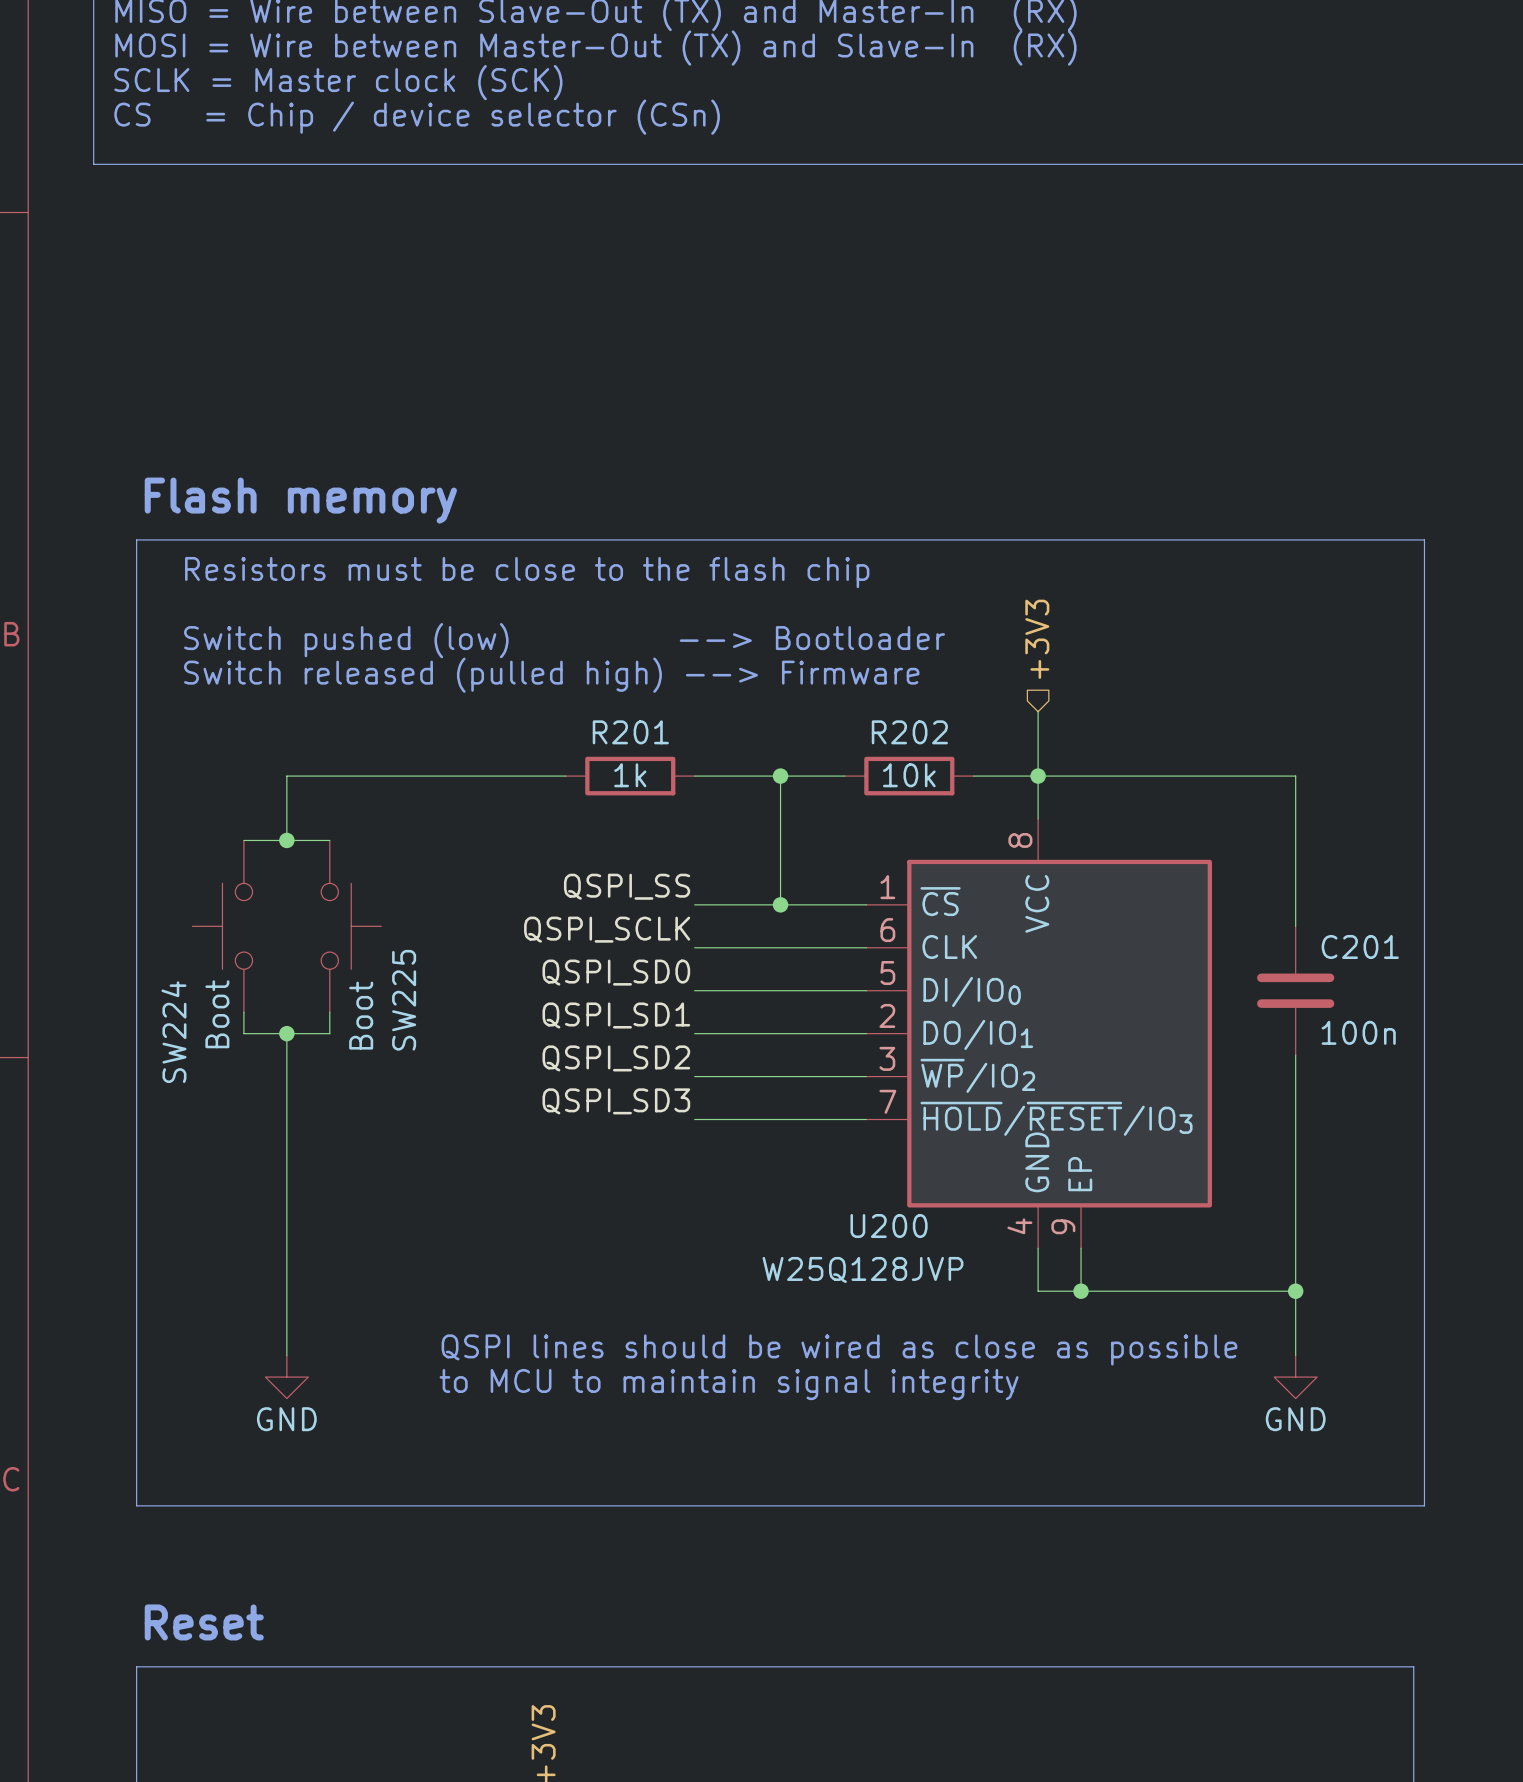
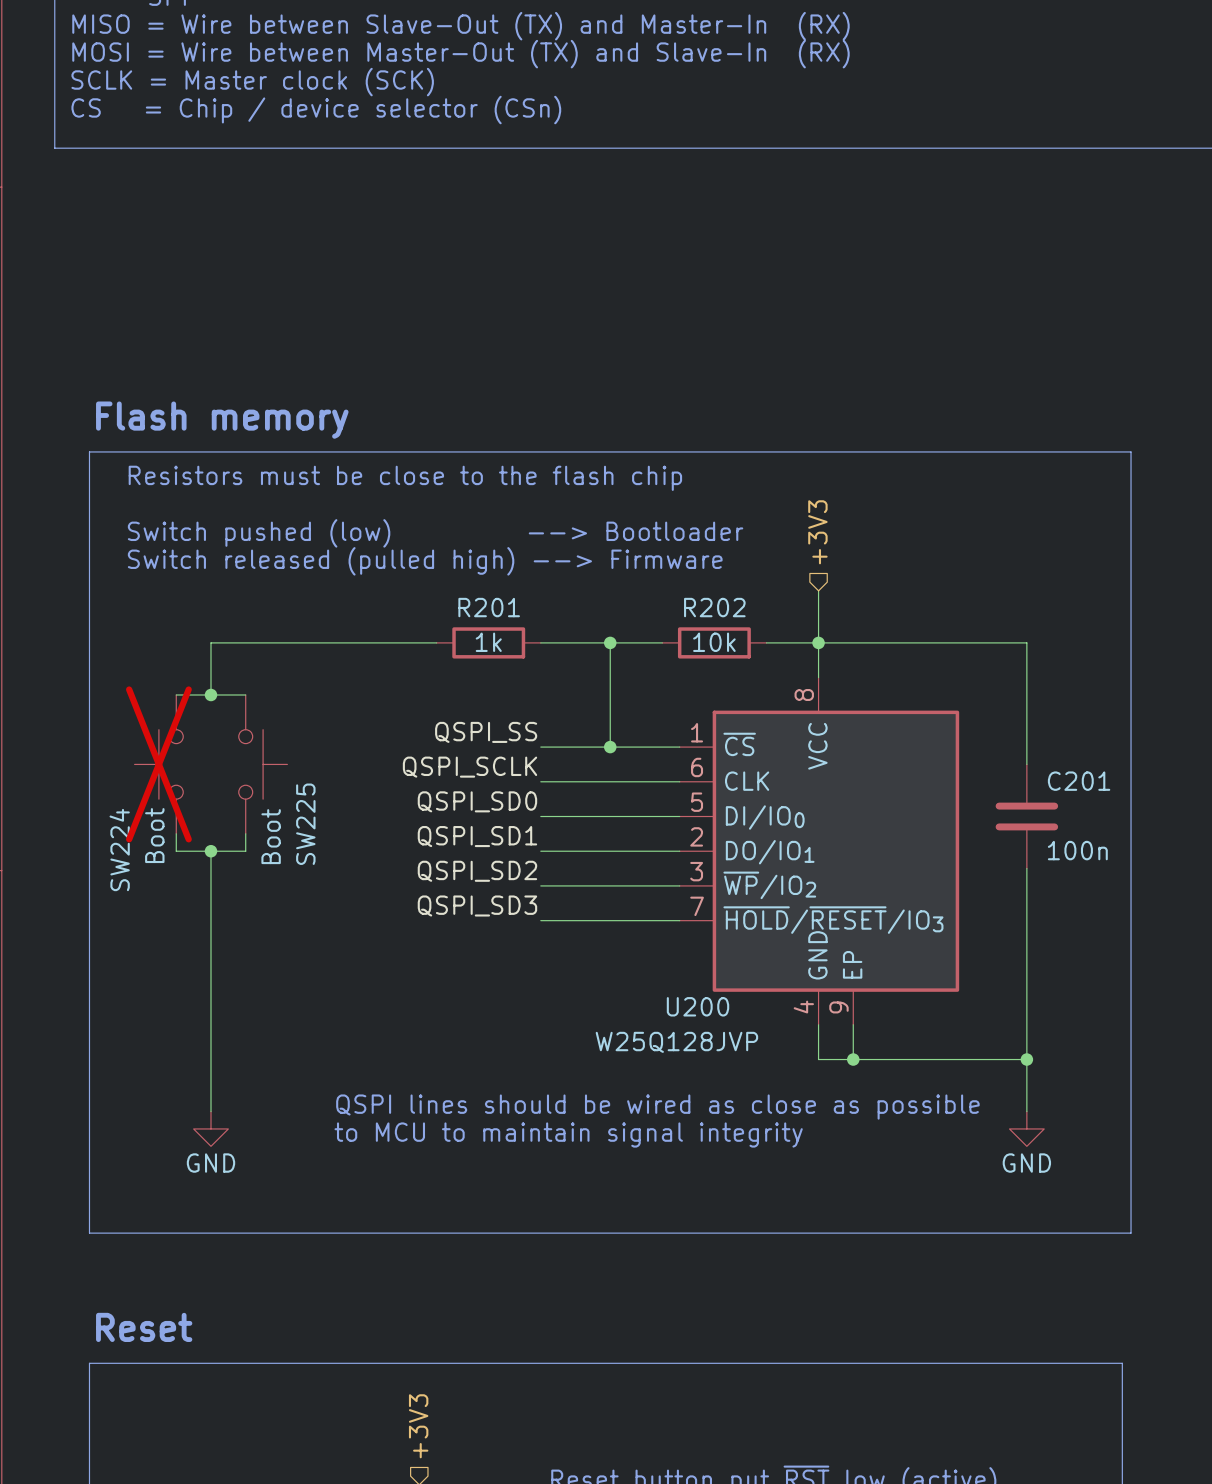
SW224 do-not-place cross: none -> (158, 764)

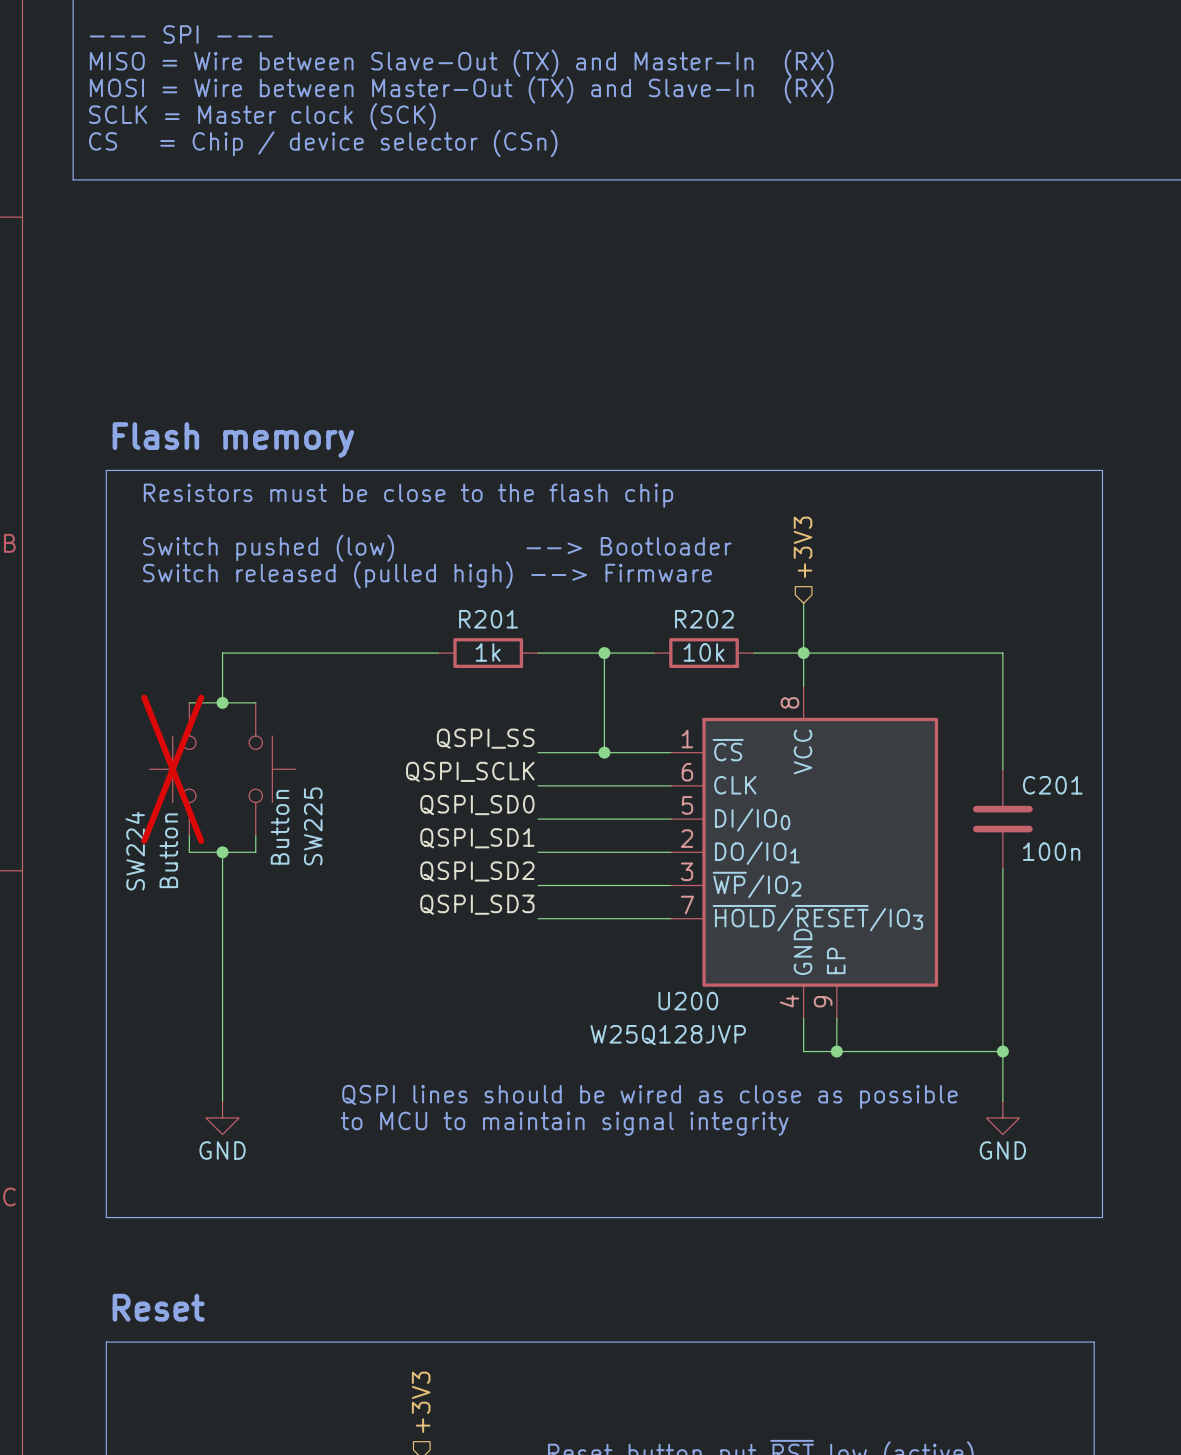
SW224 value: Boot (154, 835) -> Button (168, 850)
SW225 value: Boot (271, 836) -> Button (280, 827)

